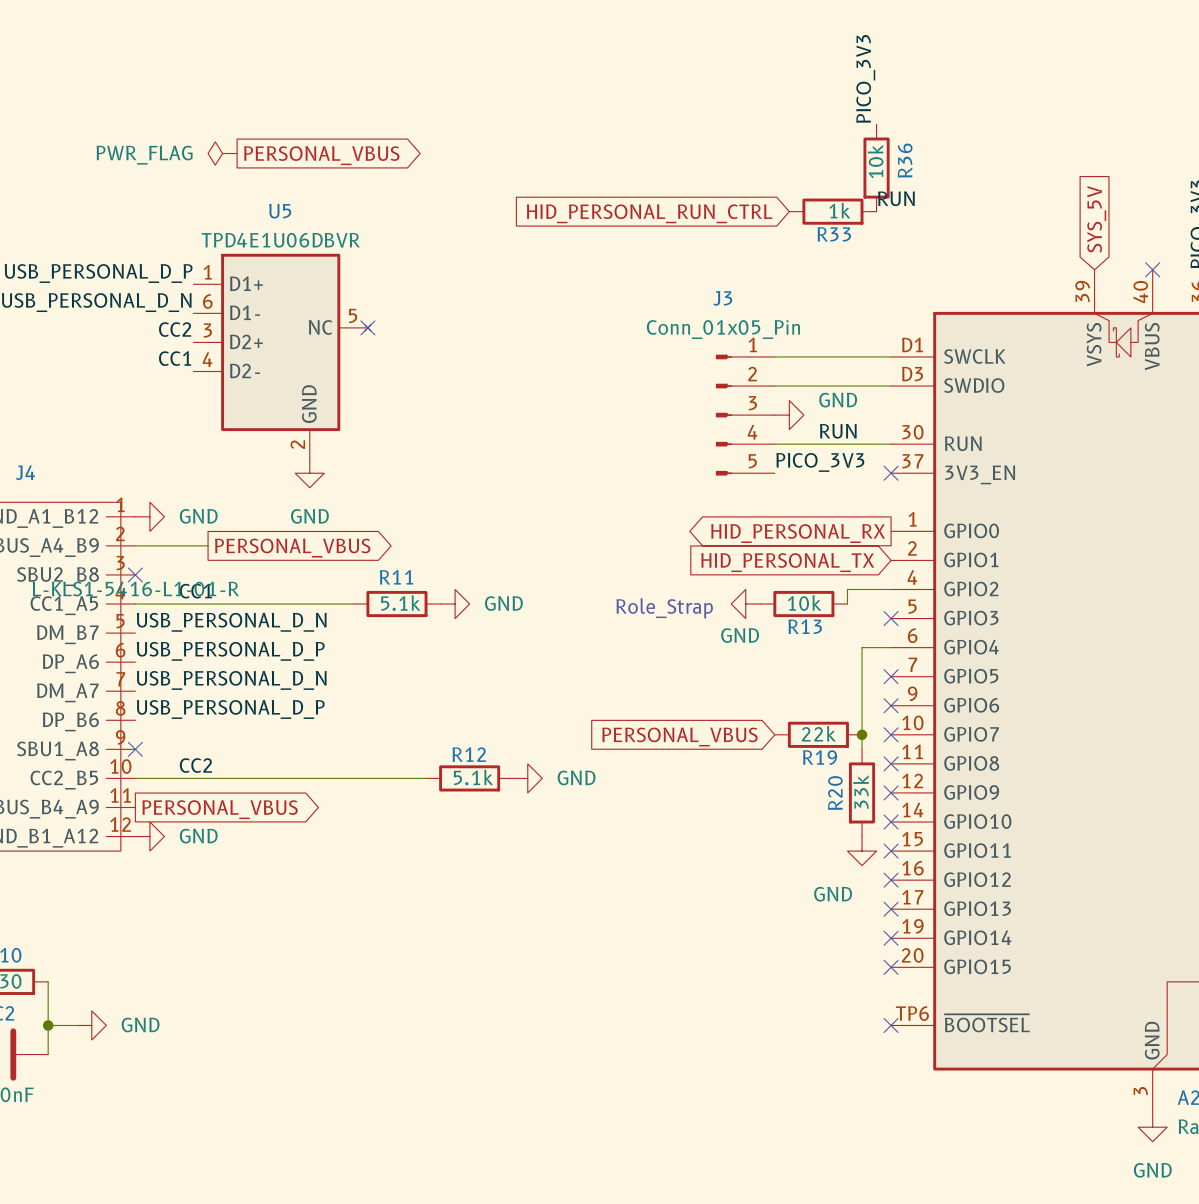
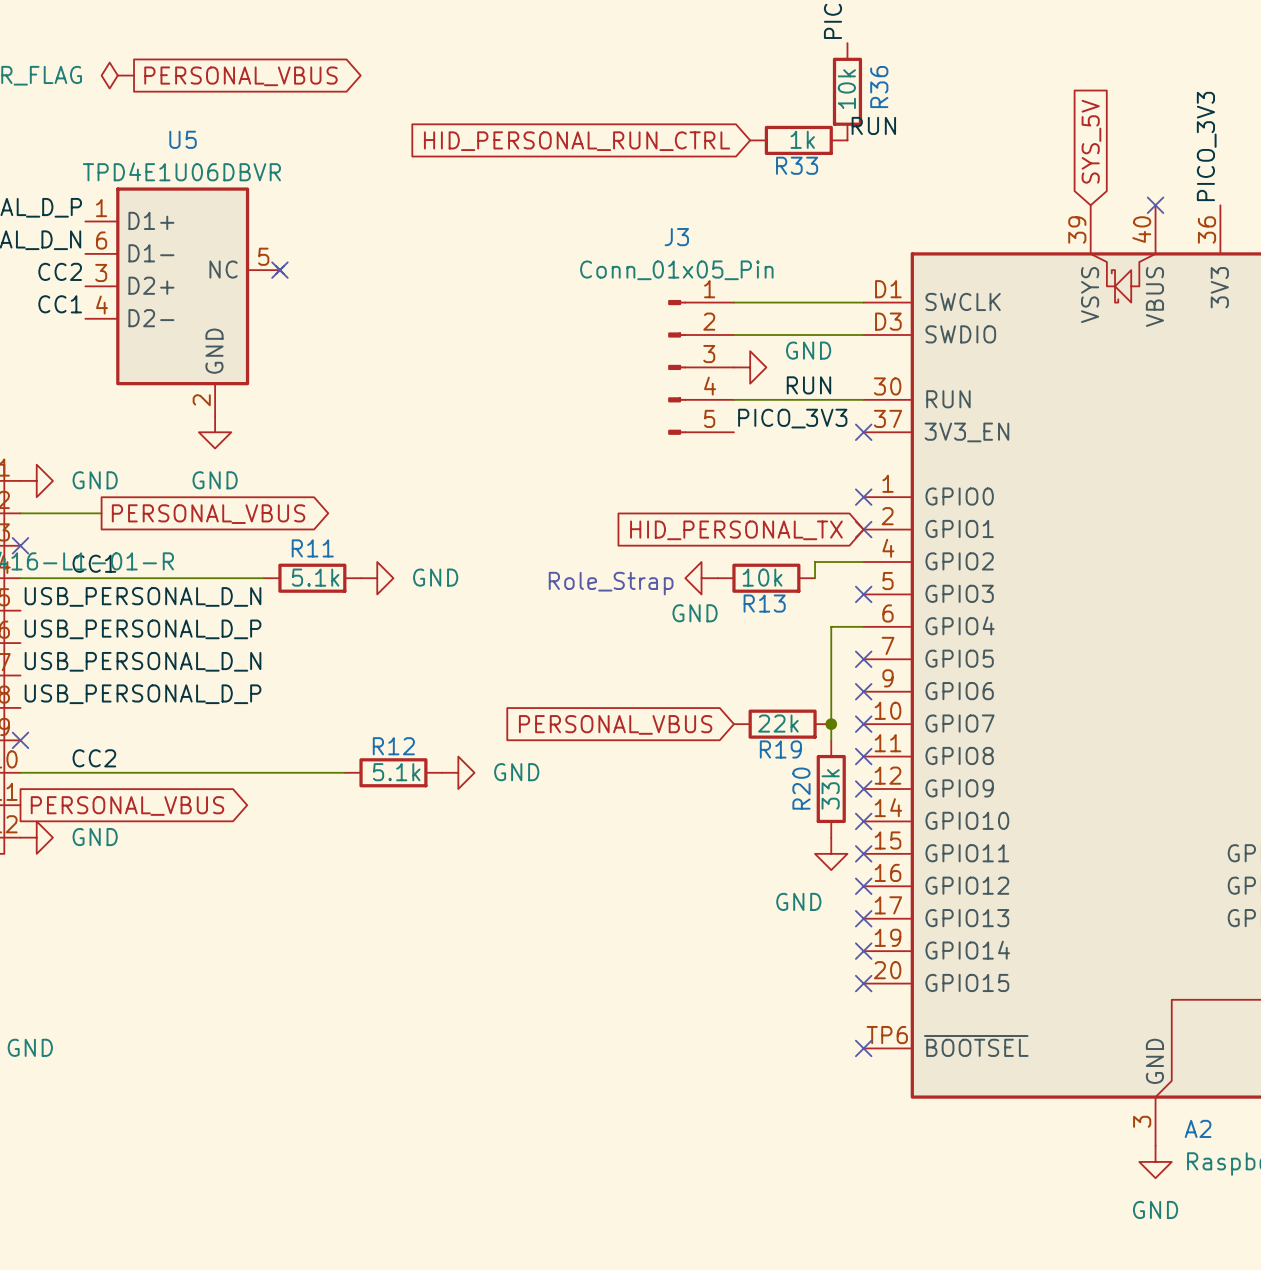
no-connect mark: none -> (863, 497)
global label: HID_PERSONAL_RX (798, 533) -> none
no-connect mark: none -> (863, 529)

